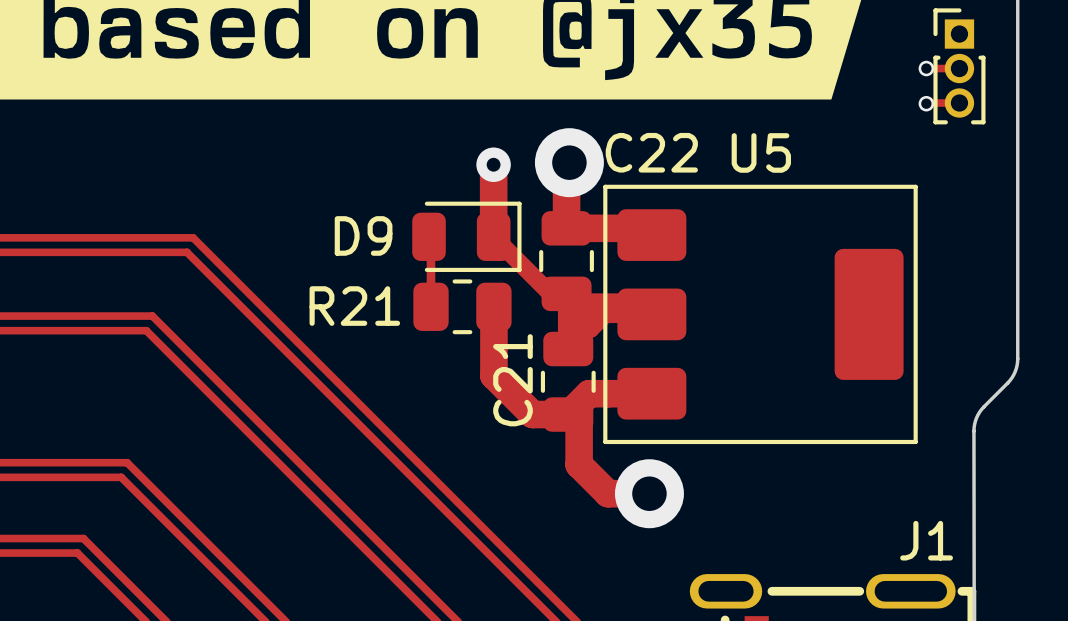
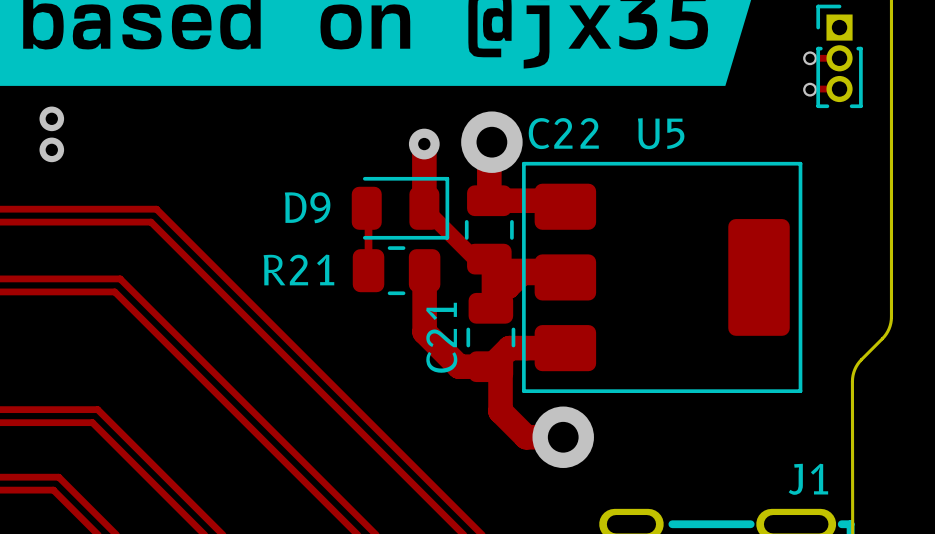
via: none -> (51, 118)
via: none -> (51, 149)

